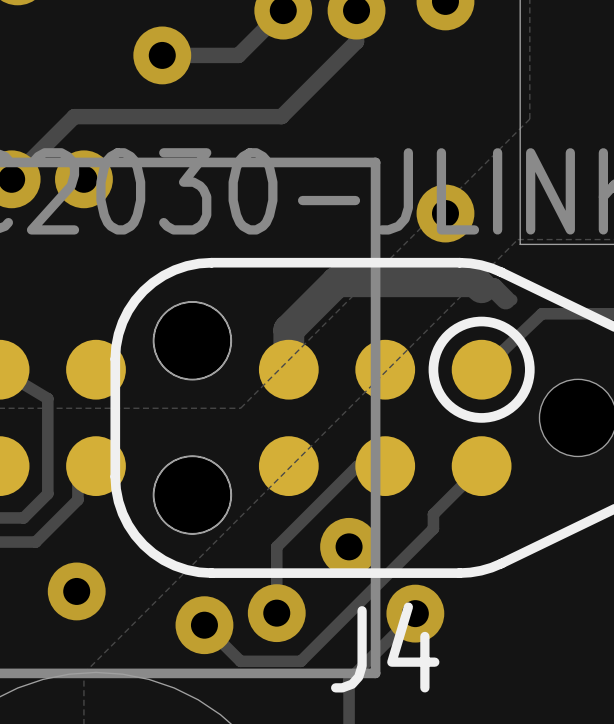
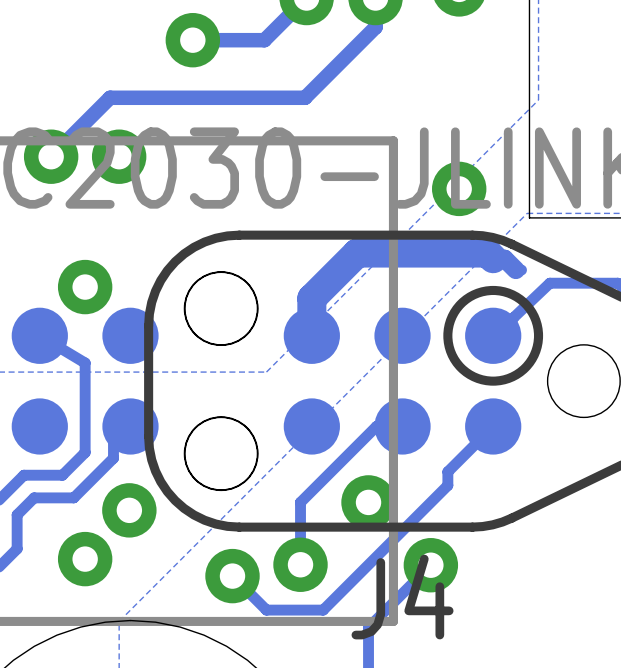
via: none -> (85, 287)
via: none -> (129, 510)
via: (76, 591) -> none
via: none -> (85, 559)

